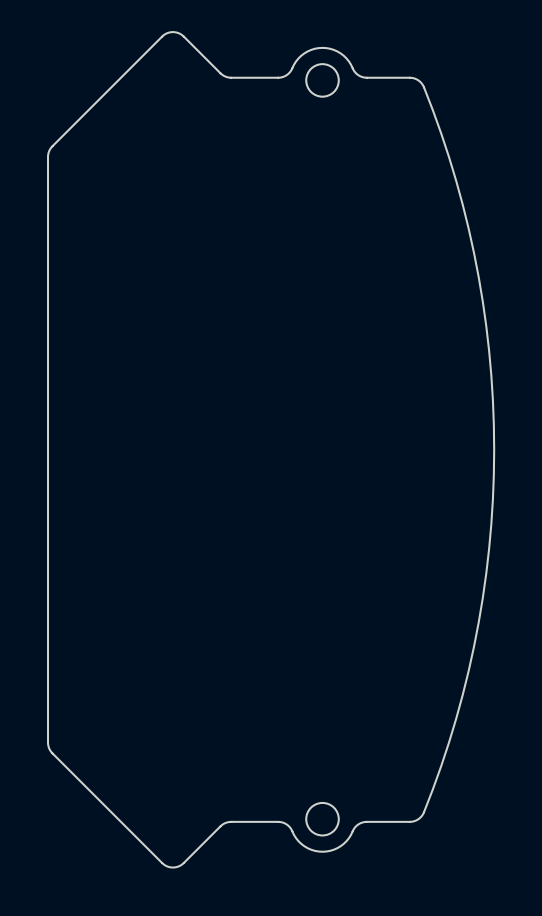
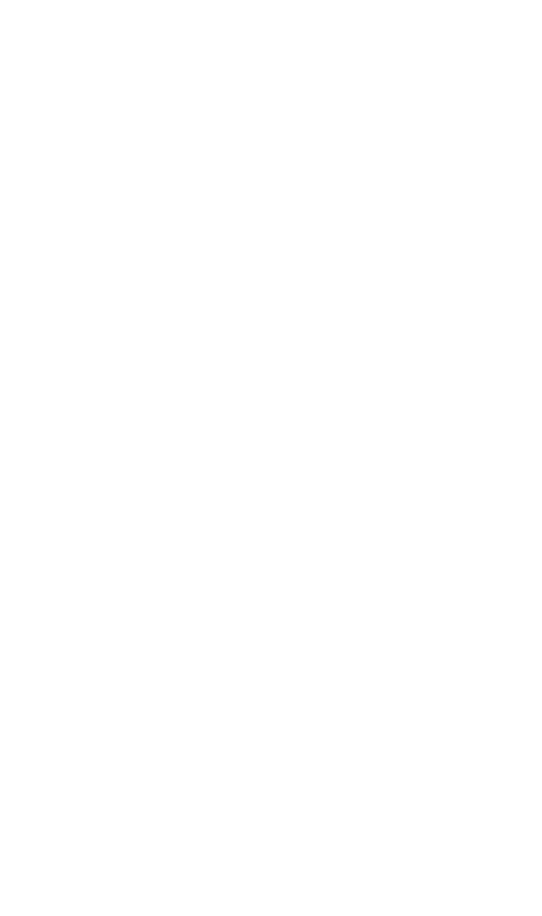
board edge: (183, 36) (220, 73) (227, 77) (283, 76) (289, 72) (296, 61) (304, 53) (322, 47) (340, 53) (348, 61) (355, 72) (361, 76) (411, 77) (422, 84) (441, 133) (456, 180) (478, 277) (491, 375) (493, 474) (486, 573) (474, 646) (449, 742) (421, 816) (411, 821) (361, 822) (355, 826) (348, 838) (340, 846) (322, 851) (304, 846) (296, 838) (289, 826) (283, 822) (227, 822) (220, 826) (182, 864) (172, 867) (162, 863) (52, 753) (48, 744) (48, 157) (52, 146) (163, 35) (172, 32) (183, 36) -> none
round board edge: [305, 63, 340, 98] -> none
round board edge: [305, 801, 340, 837] -> none

